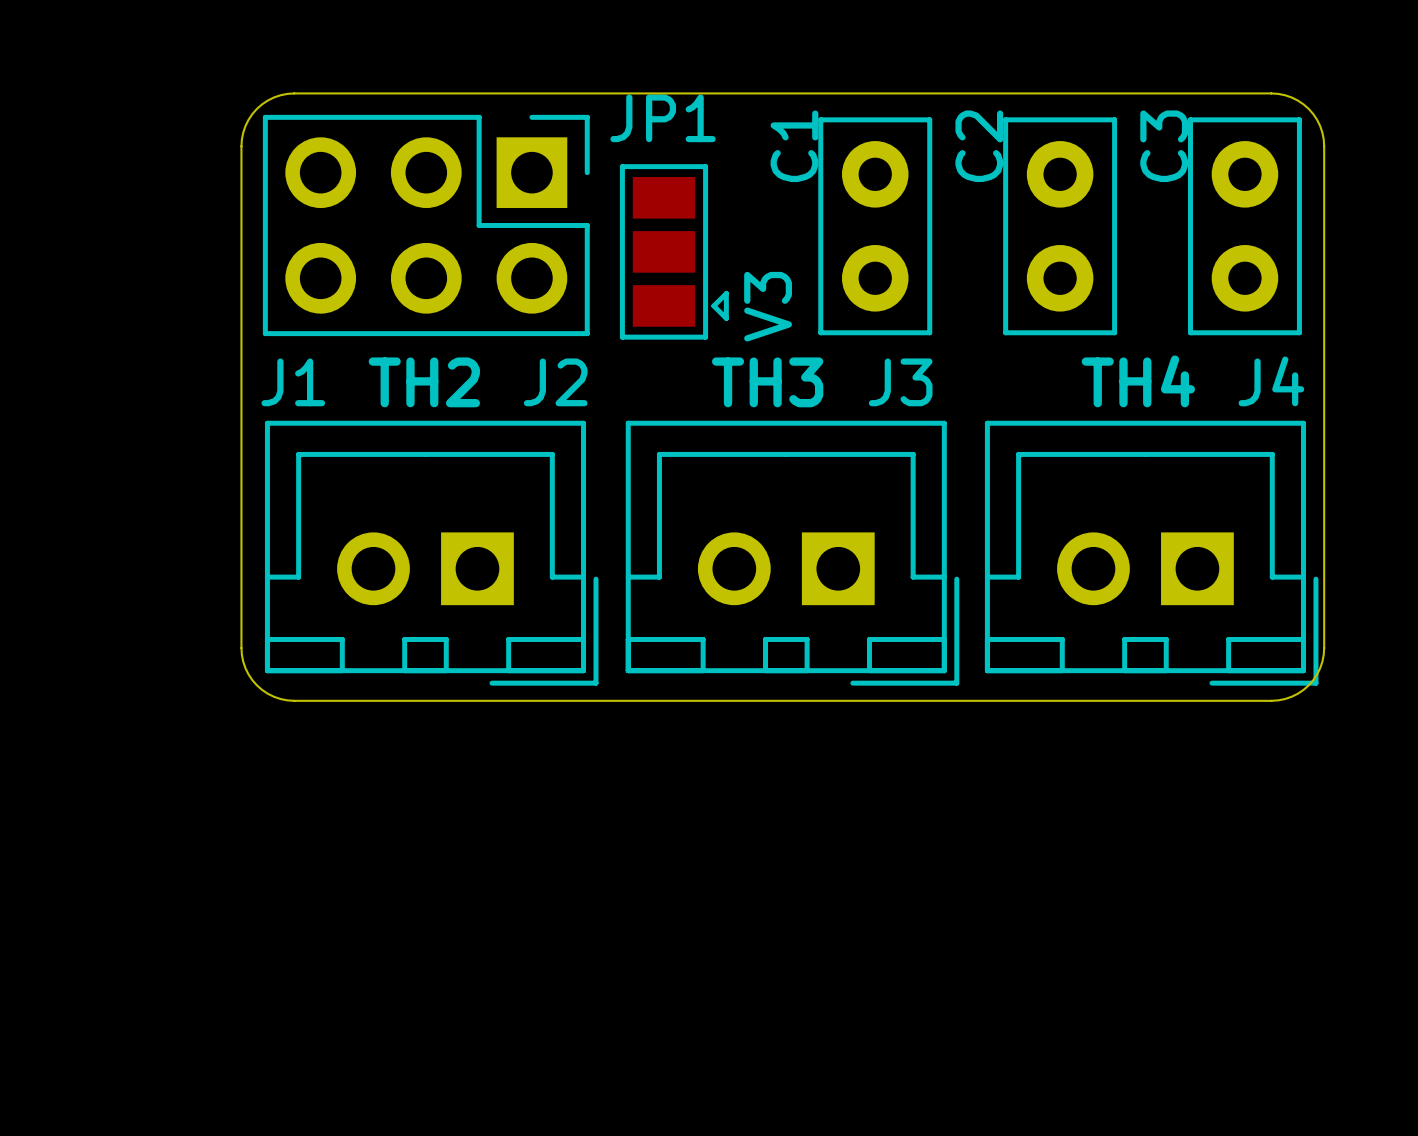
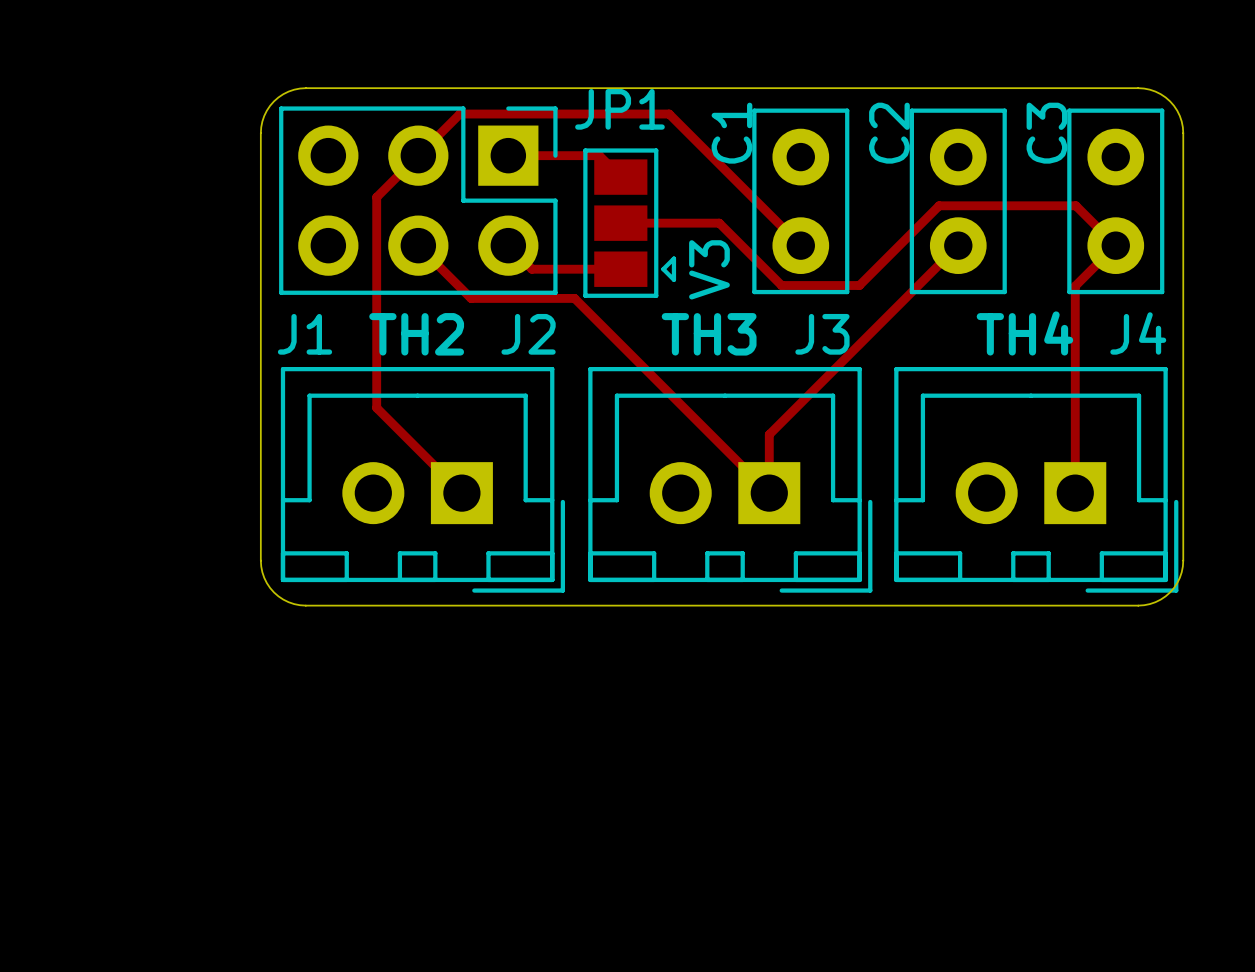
track: none -> (508, 155) (599, 155) (620, 177)
track: none -> (620, 223) (719, 223) (781, 285) (859, 285) (939, 205) (1075, 205) (1115, 245) (1075, 286) (1075, 493)
track: none -> (418, 245) (471, 298) (574, 298) (769, 493) (769, 434) (958, 245)
track: none -> (508, 245) (531, 269) (620, 269)
track: none -> (800, 245) (669, 114) (459, 114) (376, 197) (376, 407) (461, 493)

